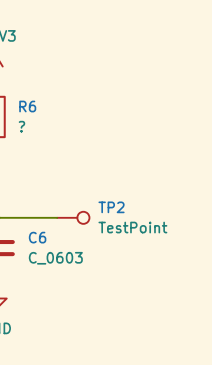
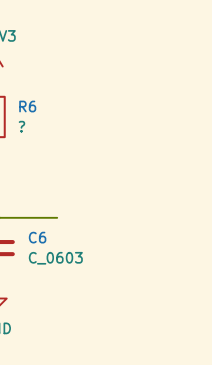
TP2: TestPoint (73, 217) -> none

